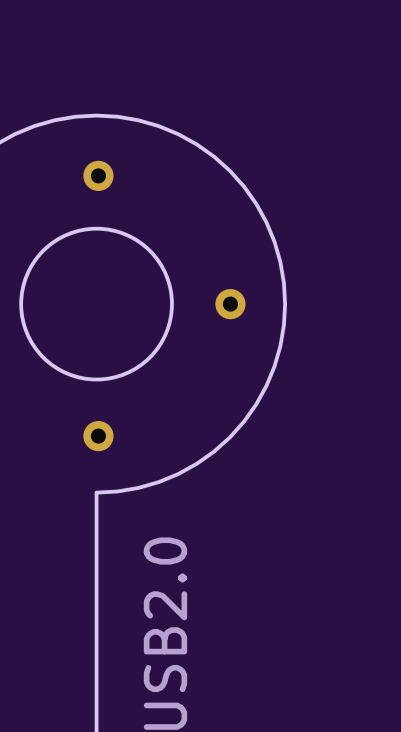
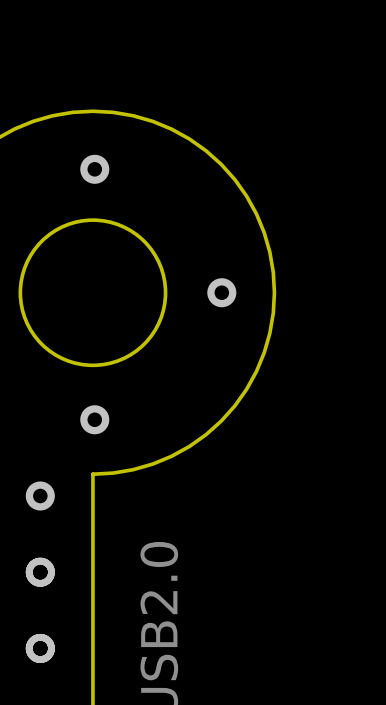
via: none -> (40, 495)
via: none -> (40, 572)
via: none -> (40, 648)

